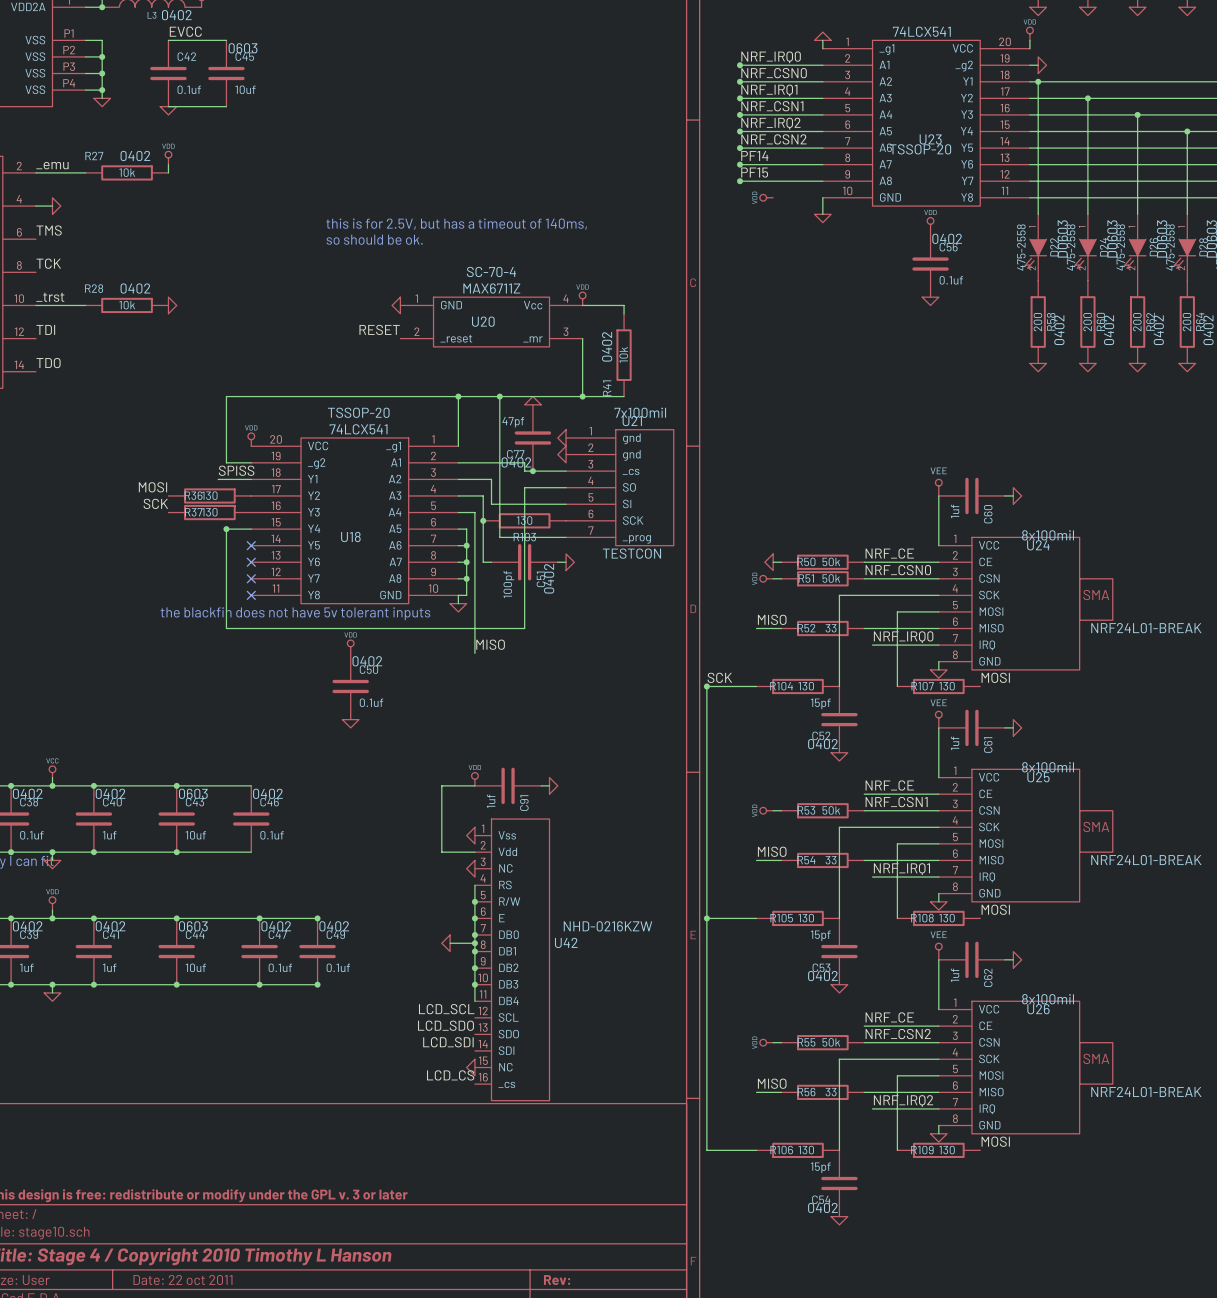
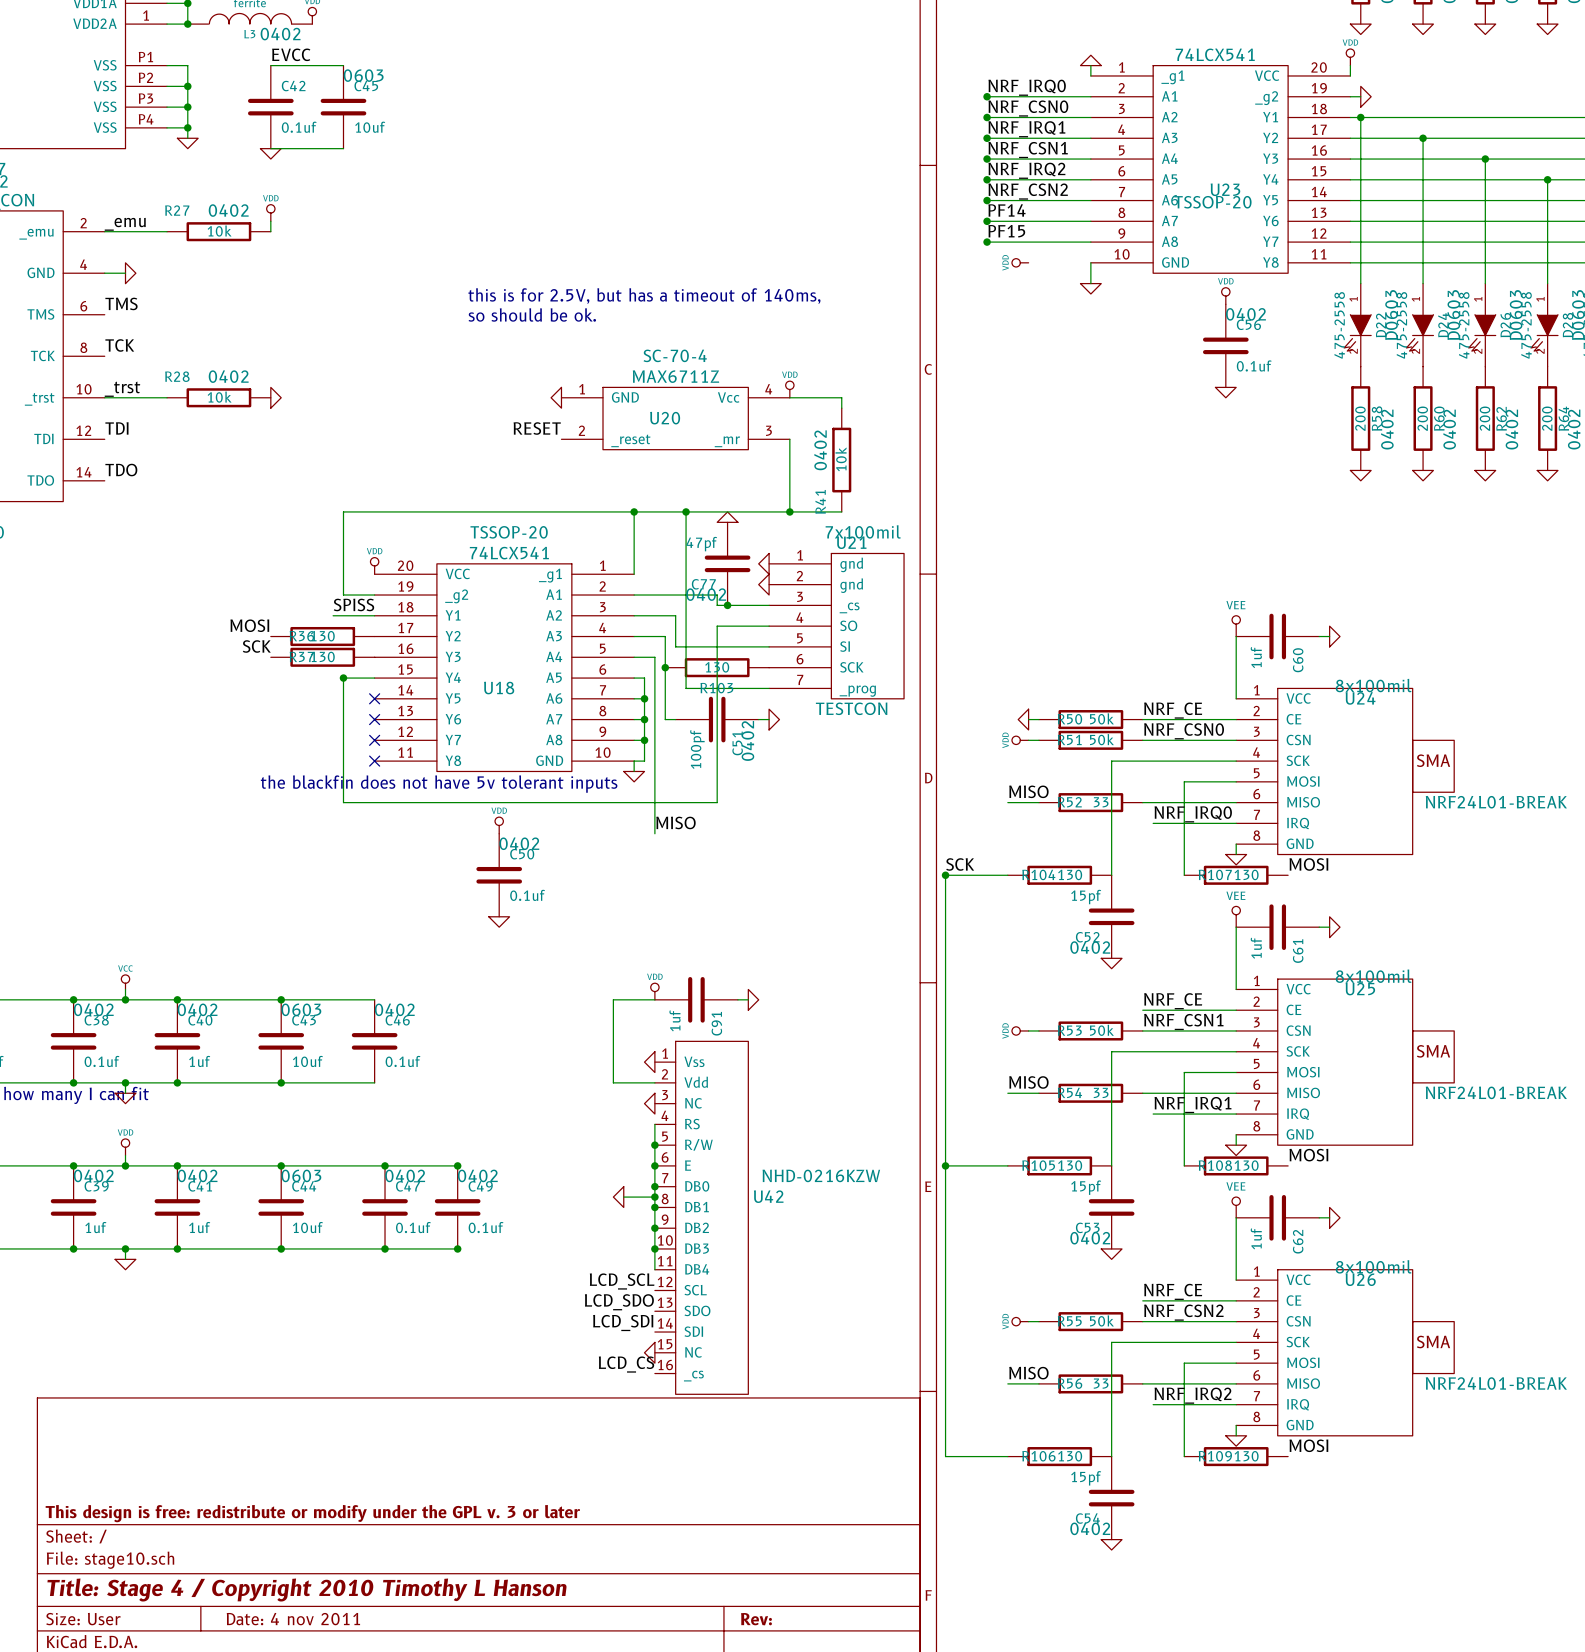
title block: Date: 22 oct 2011 (182, 1279) -> Date: 4 nov 2011 (293, 1619)

